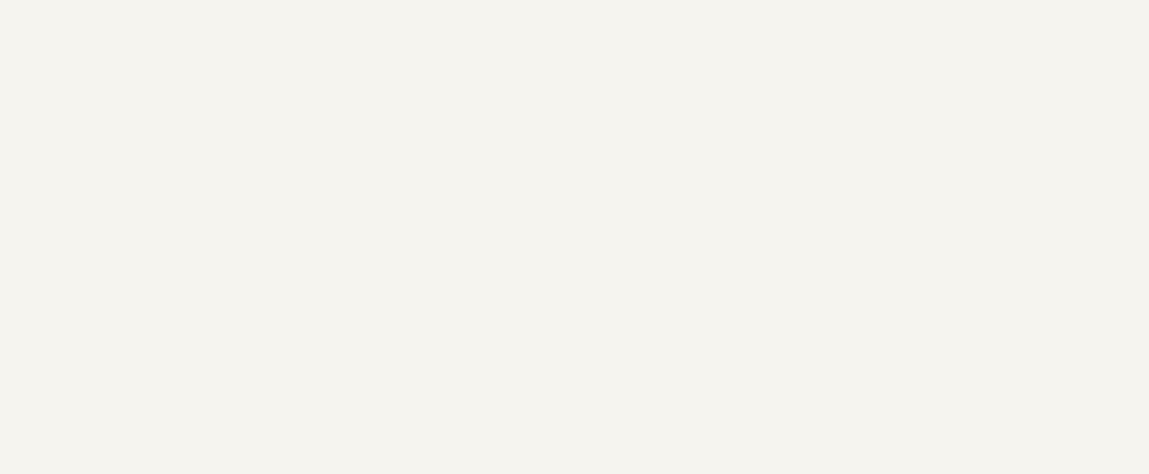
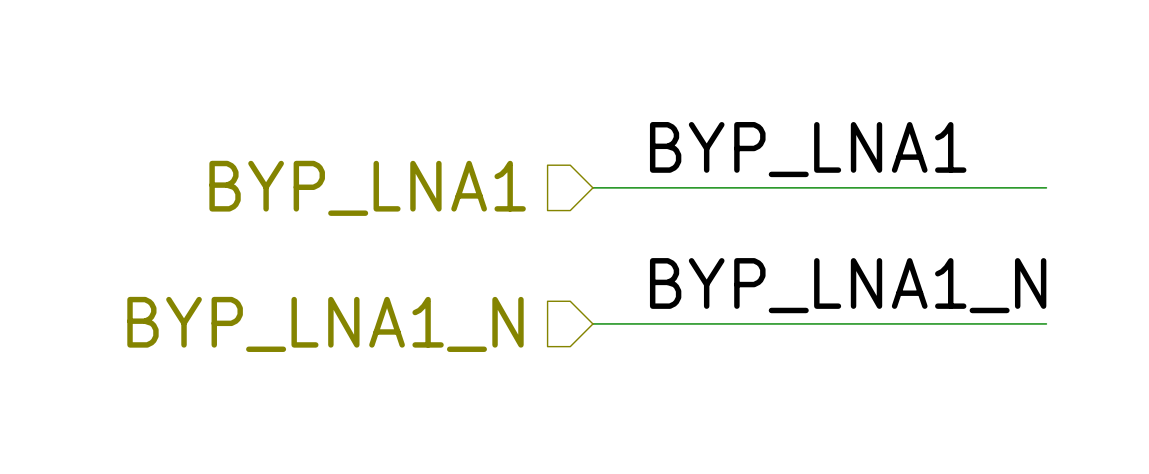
label: none -> BYP_LNA1 (808, 149)
wire: none -> (592, 187) (1046, 187)
hierarchical label: none -> BYP_LNA1 (367, 188)
label: none -> BYP_LNA1_N (848, 285)
wire: none -> (592, 323) (1046, 323)
hierarchical label: none -> BYP_LNA1_N (325, 324)

